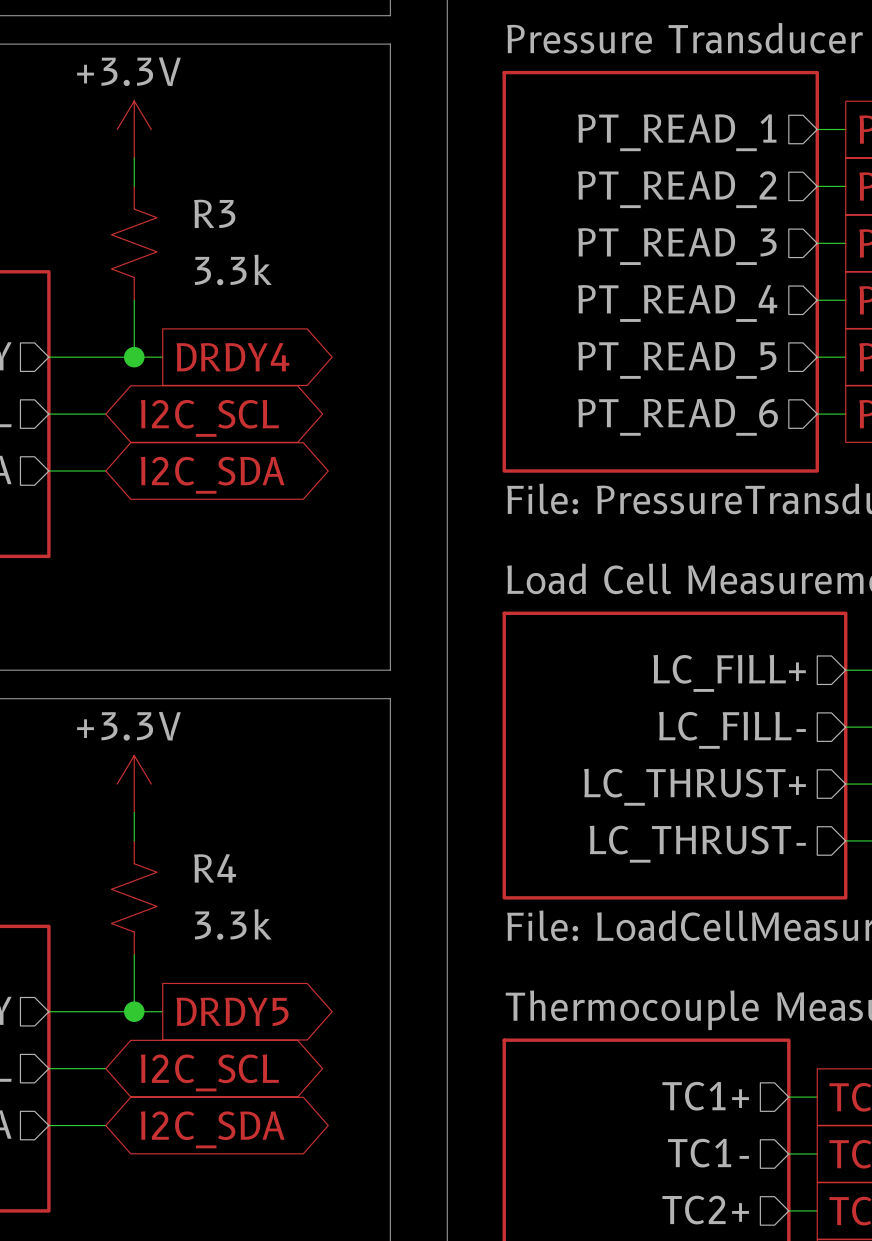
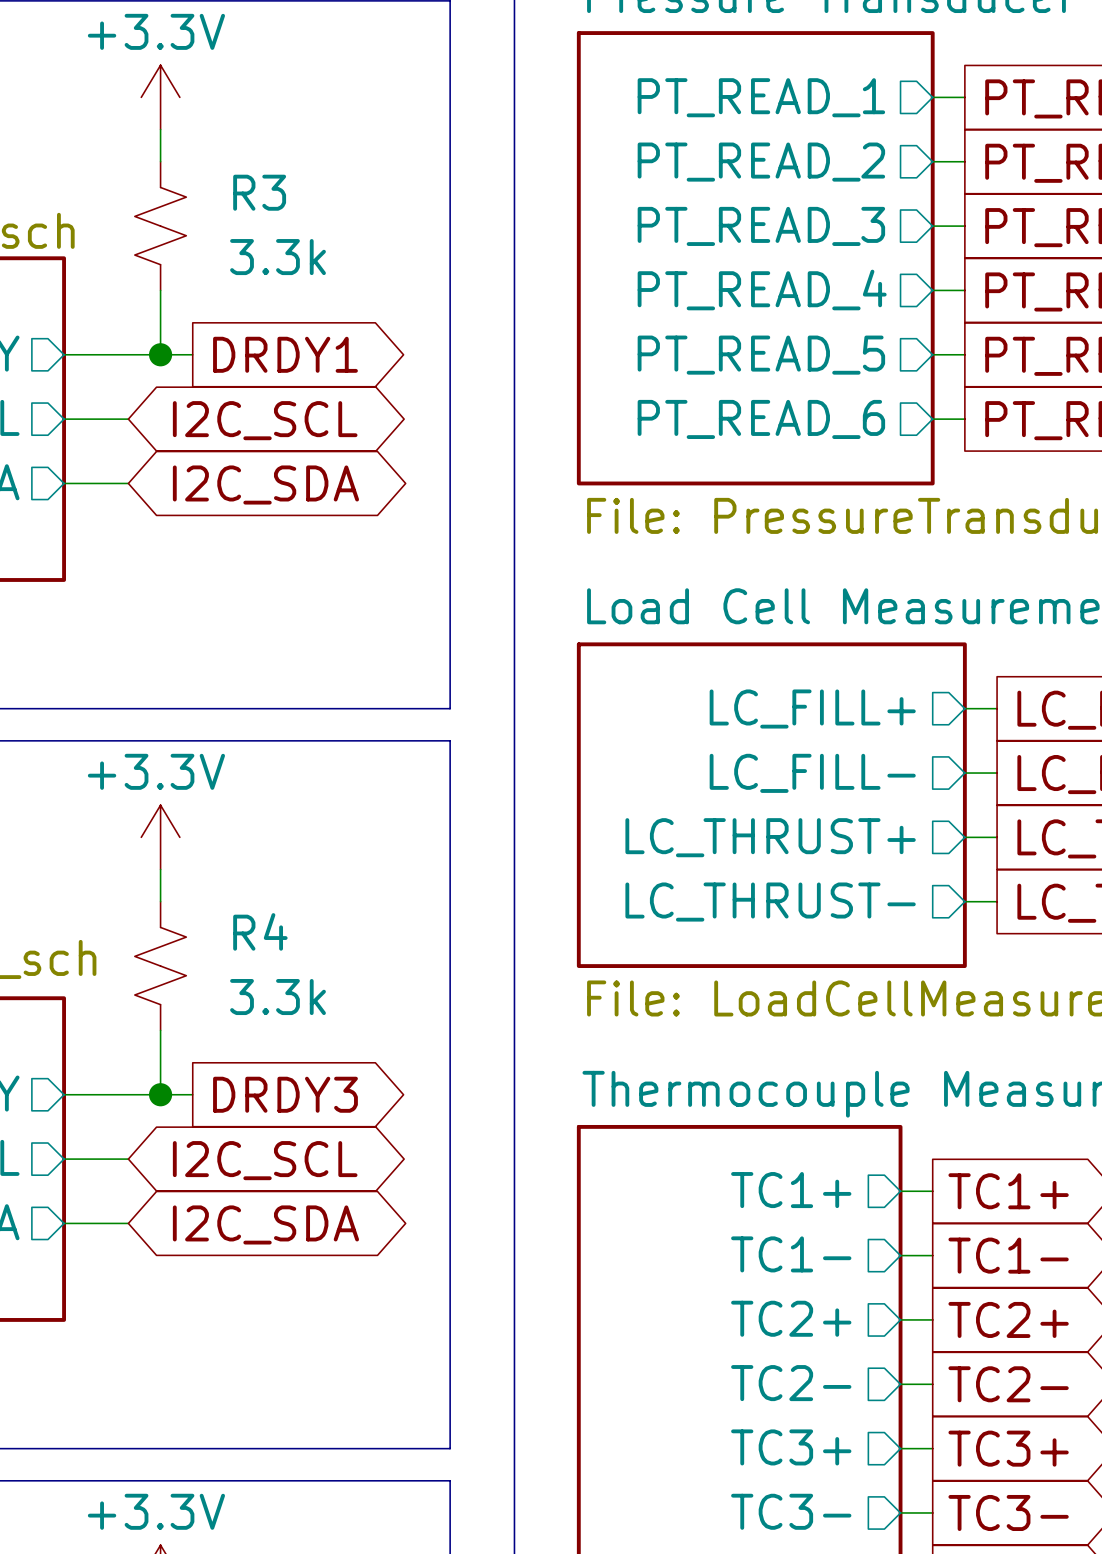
global label: DRDY4 (233, 357) -> DRDY1 (285, 354)
global label: DRDY5 (232, 1011) -> DRDY3 (285, 1094)

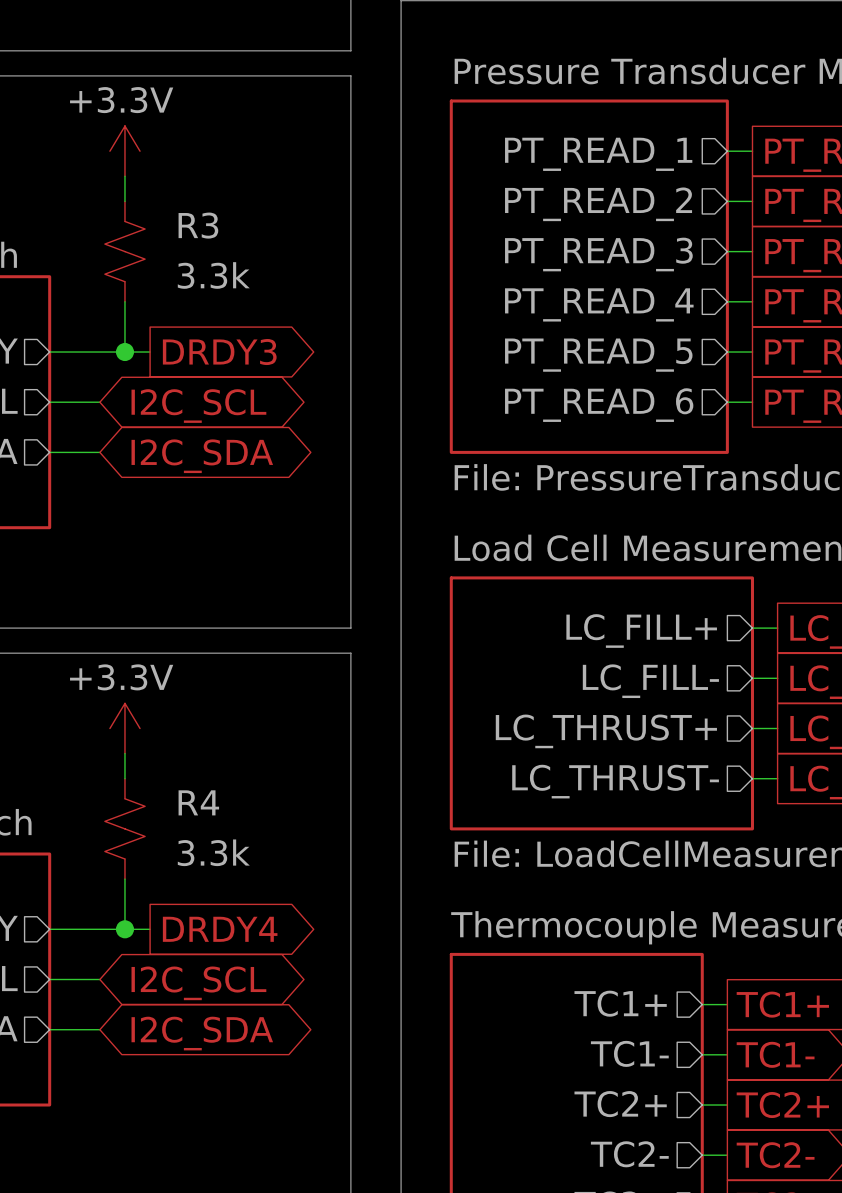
global label: DRDY1 (285, 354) -> DRDY3 (219, 352)
global label: DRDY3 (285, 1094) -> DRDY4 (220, 929)

